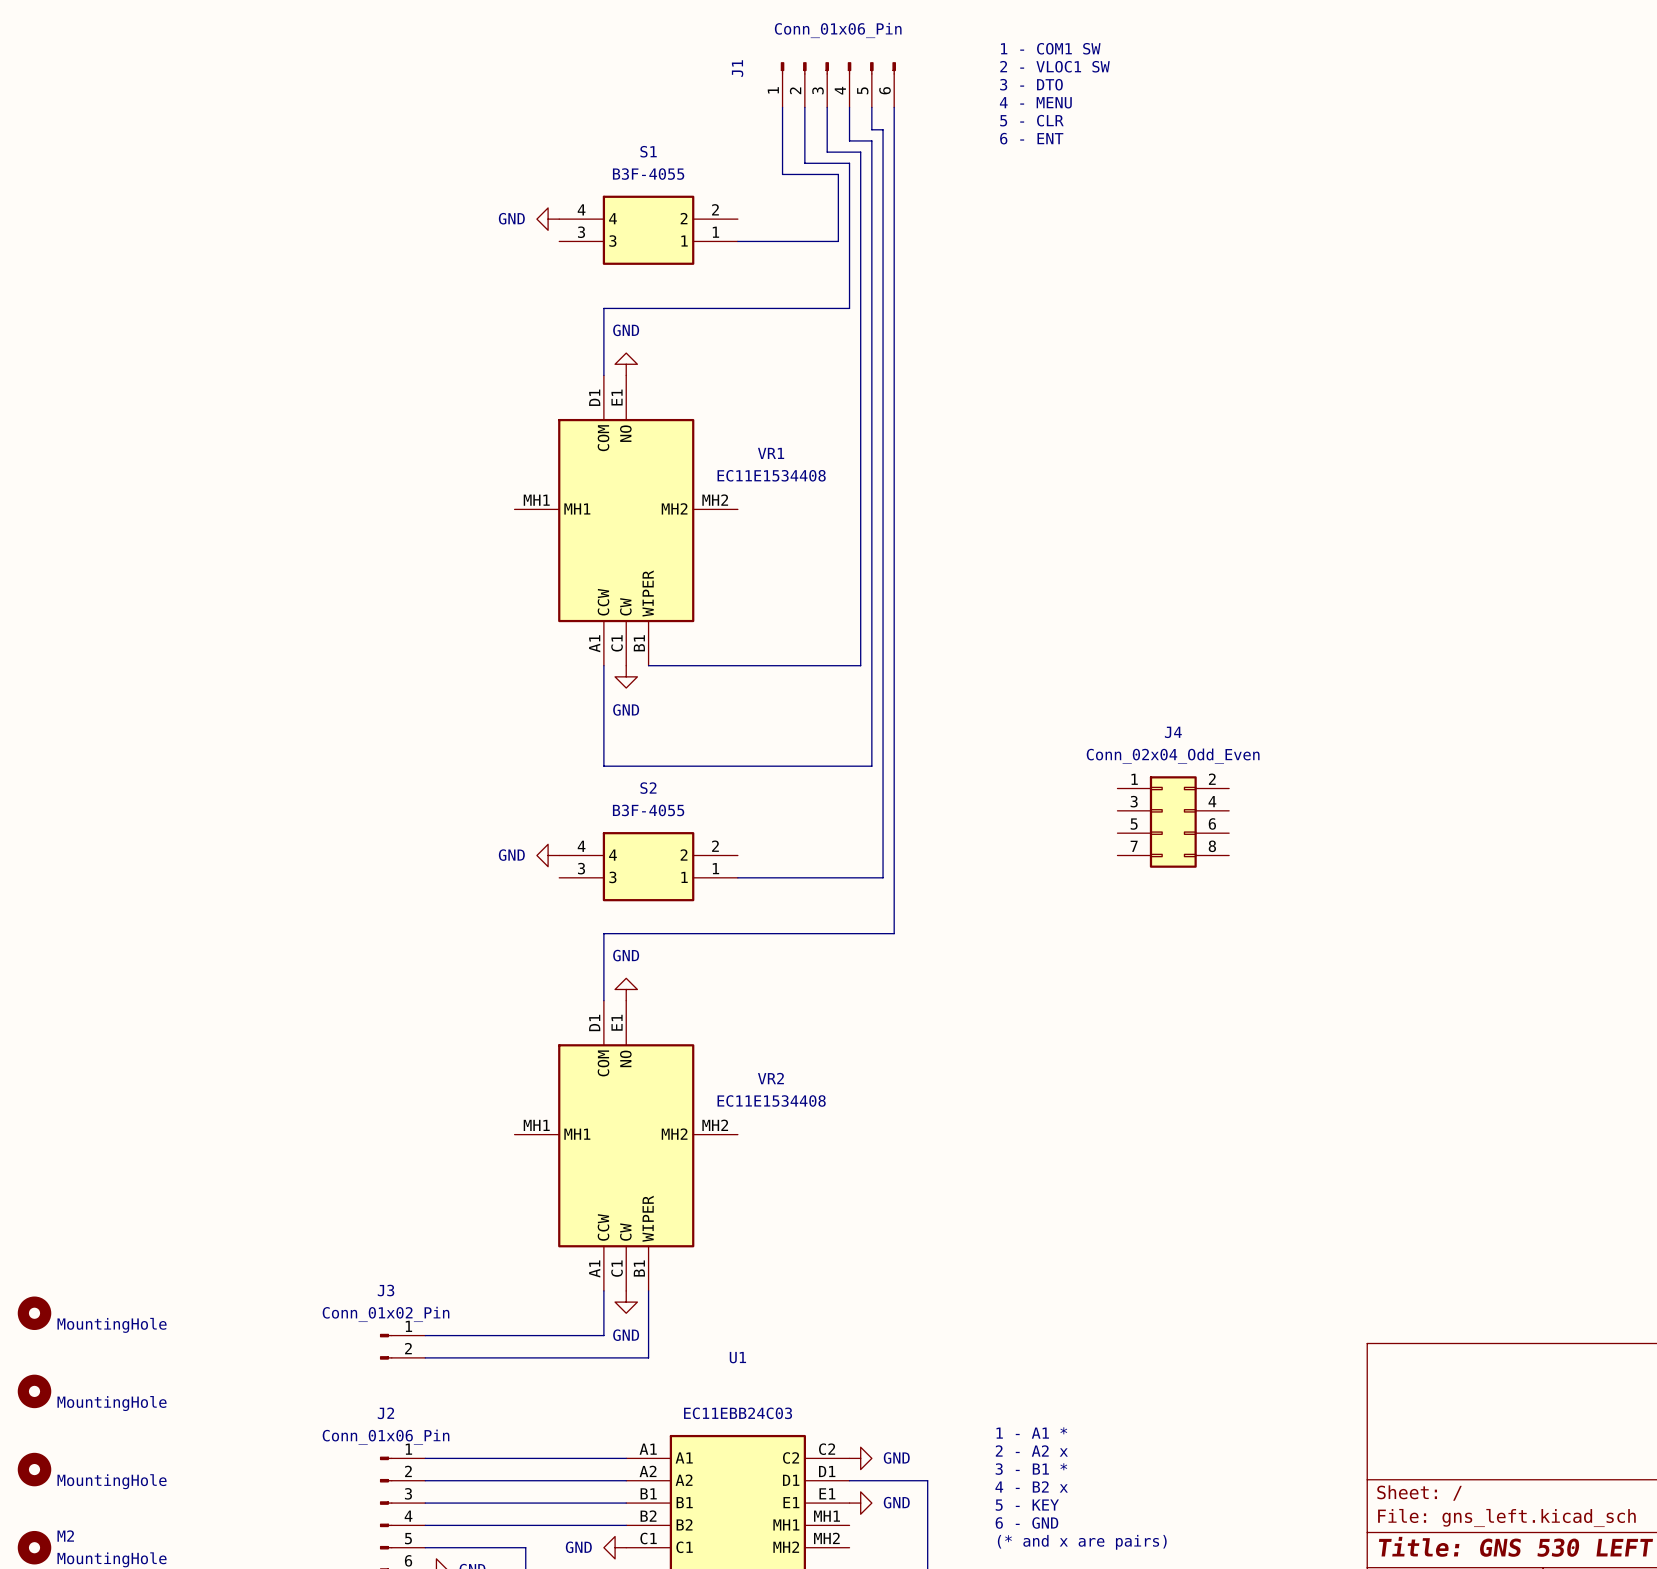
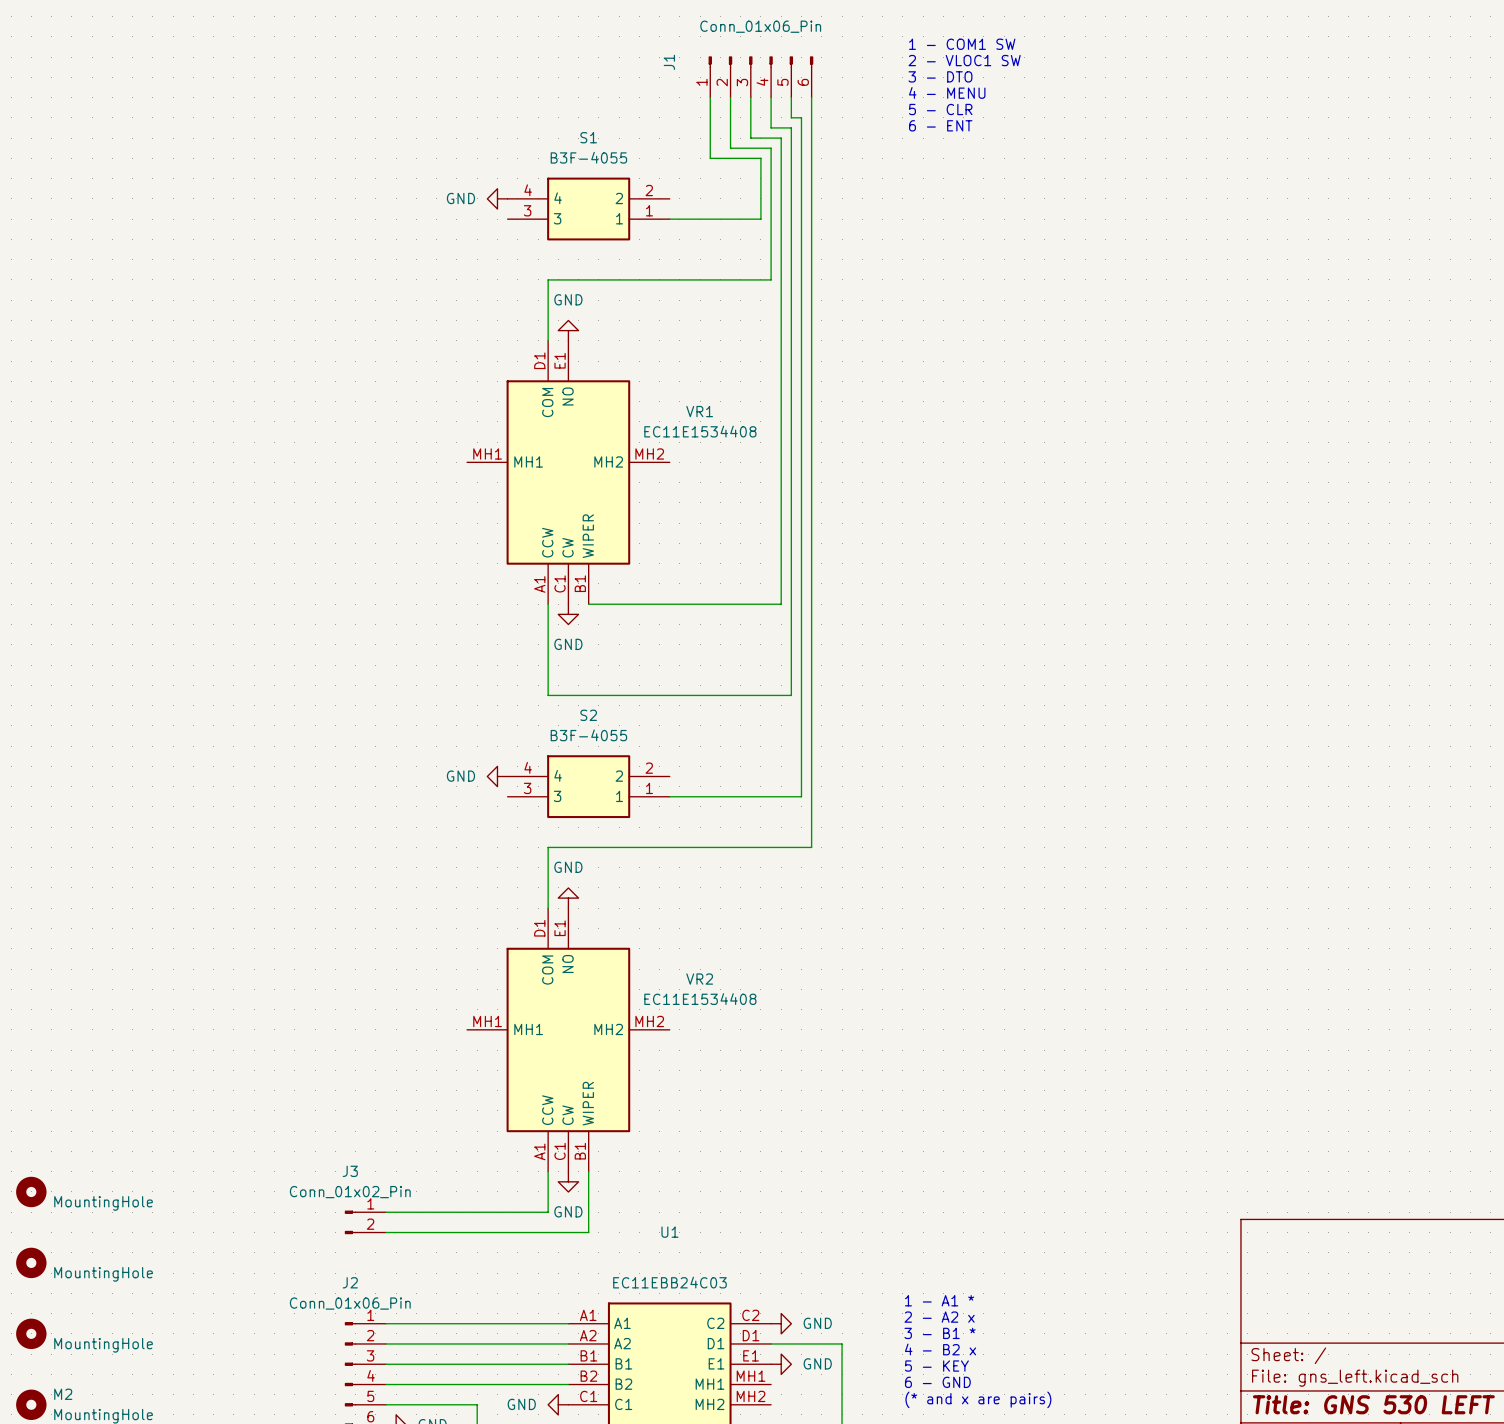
J4: Conn_02x04_Odd_Even (1173, 822) -> none

